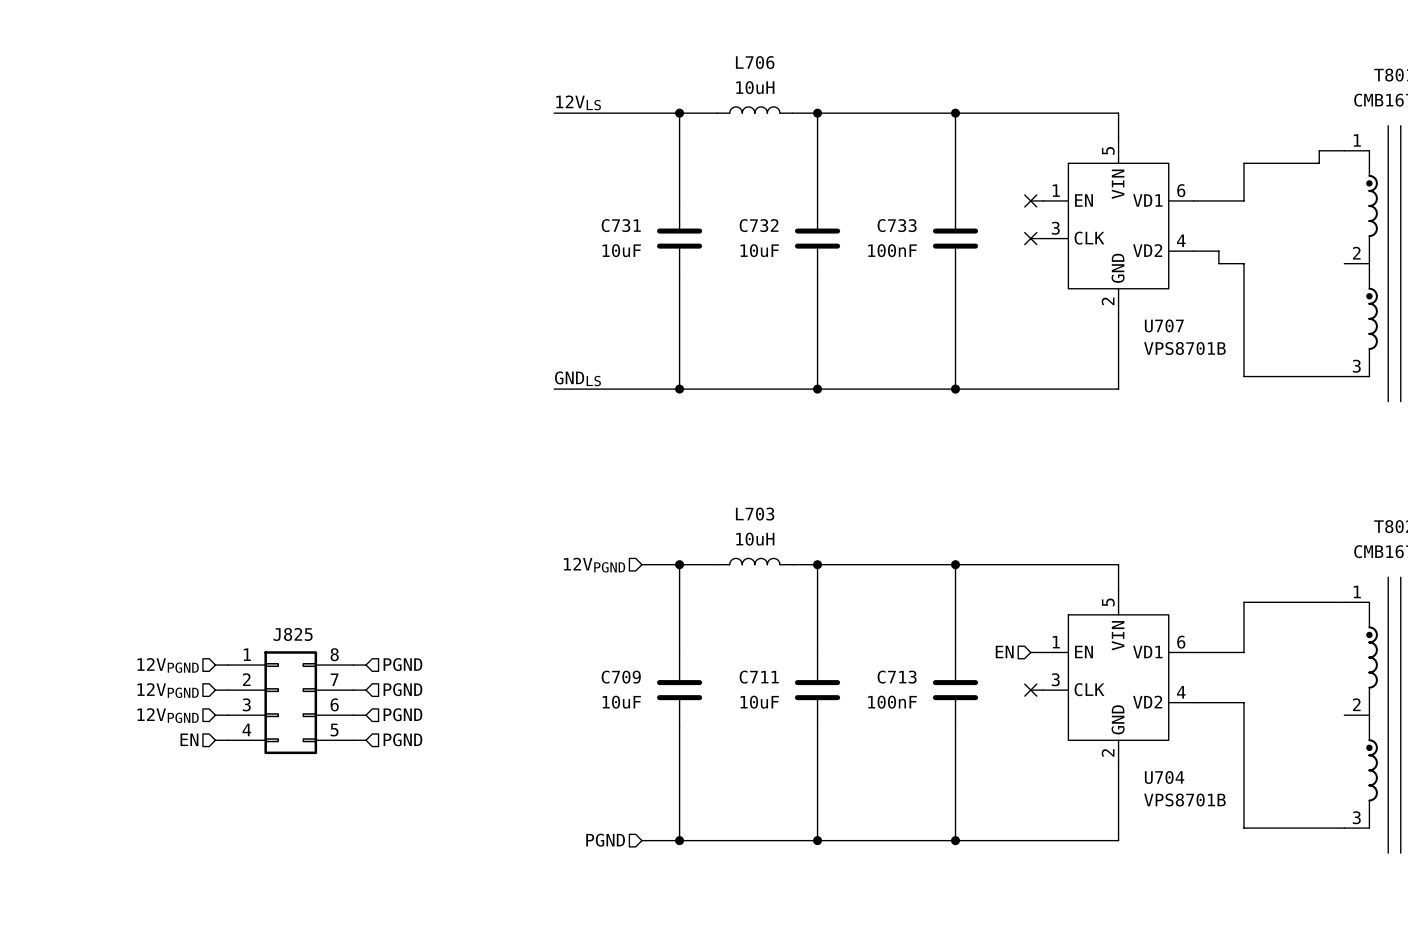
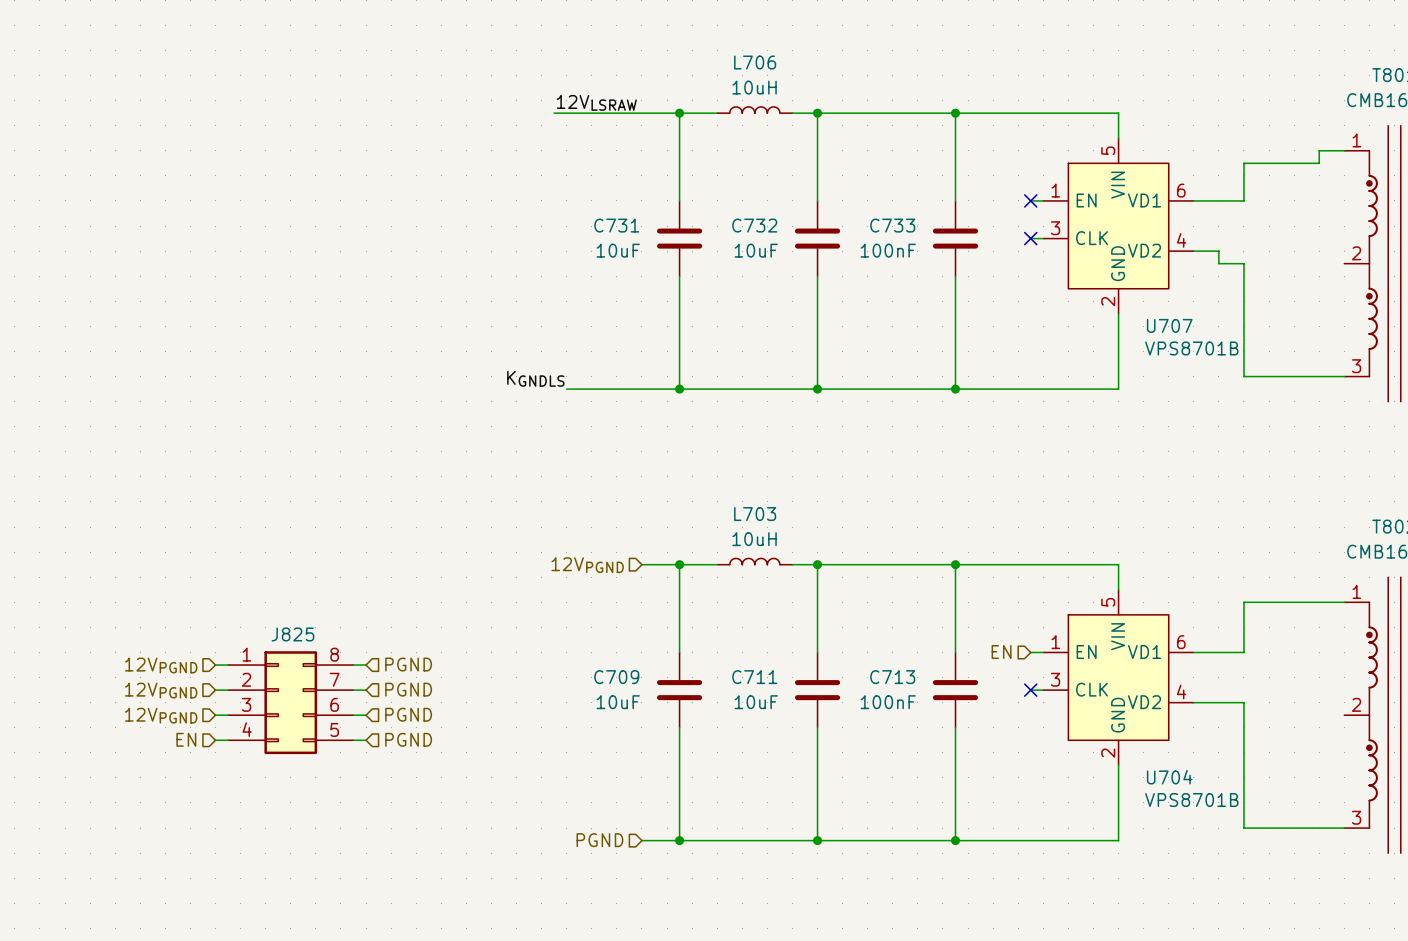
label: 12VLS (578, 102) -> 12VLSRAW (596, 102)
label: GNDLS (577, 378) -> KGNDLS (535, 378)
wire: (554, 389) (566, 389) -> none

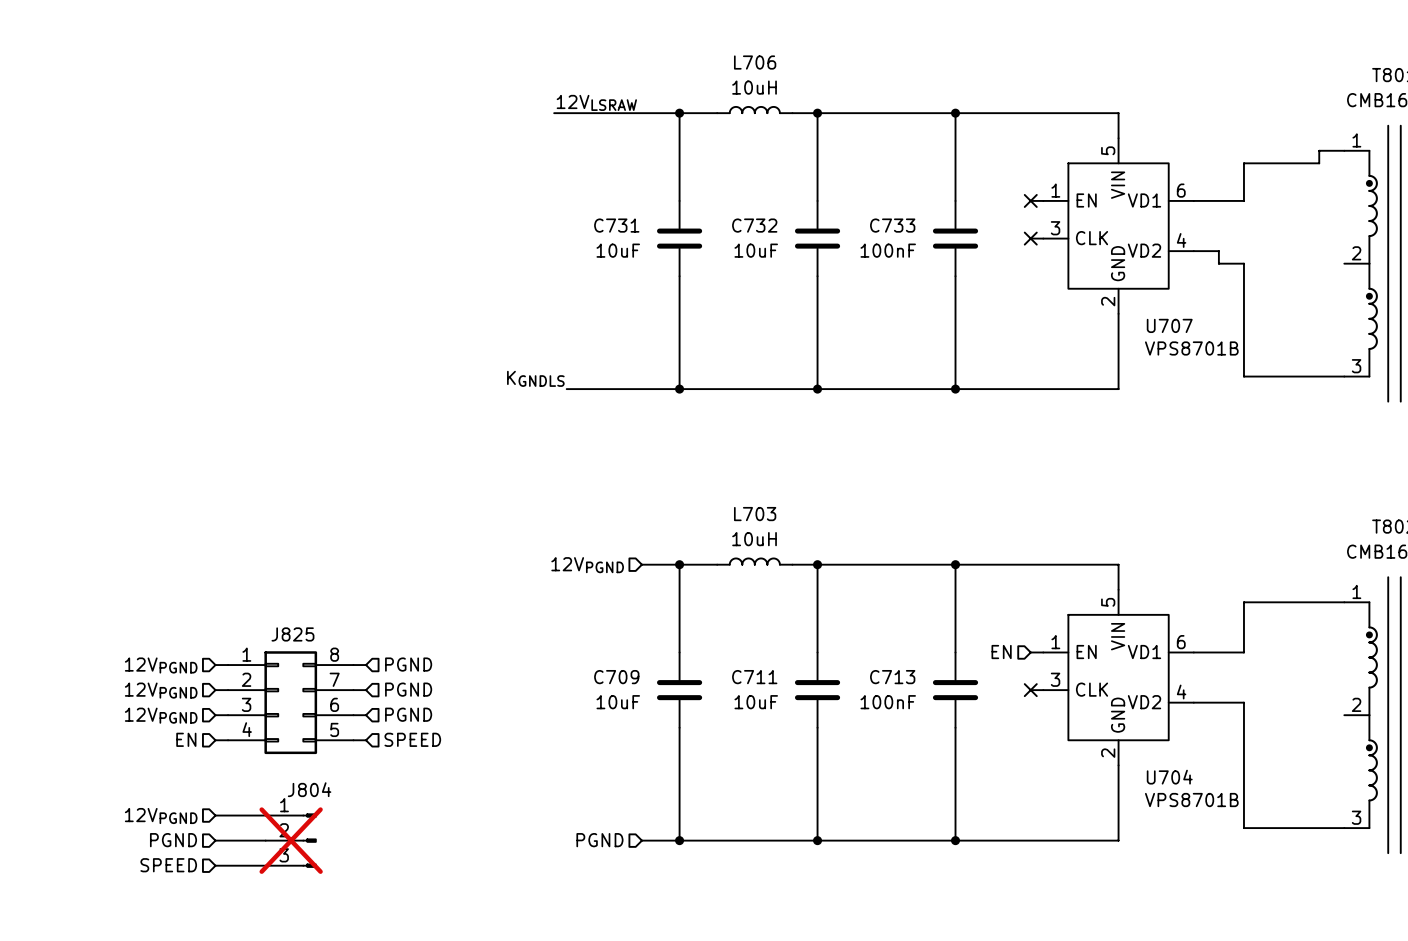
hierarchical label: PGND (408, 739) -> SPEED (412, 739)
wire: none -> (215, 815) (265, 815)
hierarchical label: none -> 12VPGND (161, 816)
hierarchical label: none -> PGND (173, 840)
wire: none -> (215, 840) (265, 840)
J804: none -> (291, 840)
hierarchical label: none -> SPEED (168, 865)
wire: none -> (215, 865) (265, 865)

